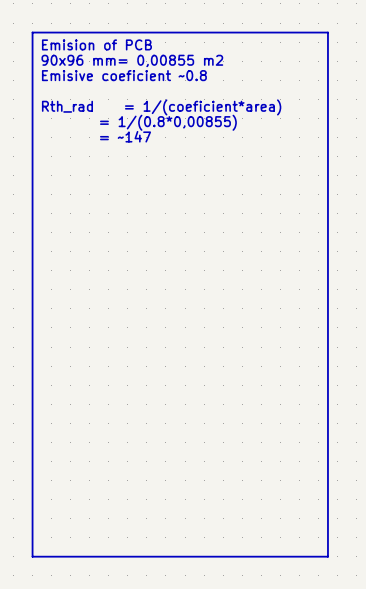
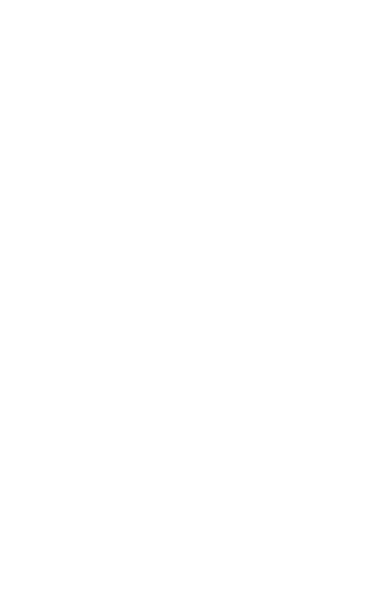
line: (32, 32) (327, 32) (327, 556) (32, 556) (32, 32) -> none
text: Emision of PCB (96, 44) -> none
text: 90x96 mm= 0,00855 m2 (132, 60) -> none
text: Emisive coeficient ~0.8 (124, 75) -> none
text: Rth_rad = 1/(coeficient*area) (161, 107) -> none
text: = 1/(0.8*0,00855) (168, 122) -> none
text: = ~147 (125, 136) -> none

